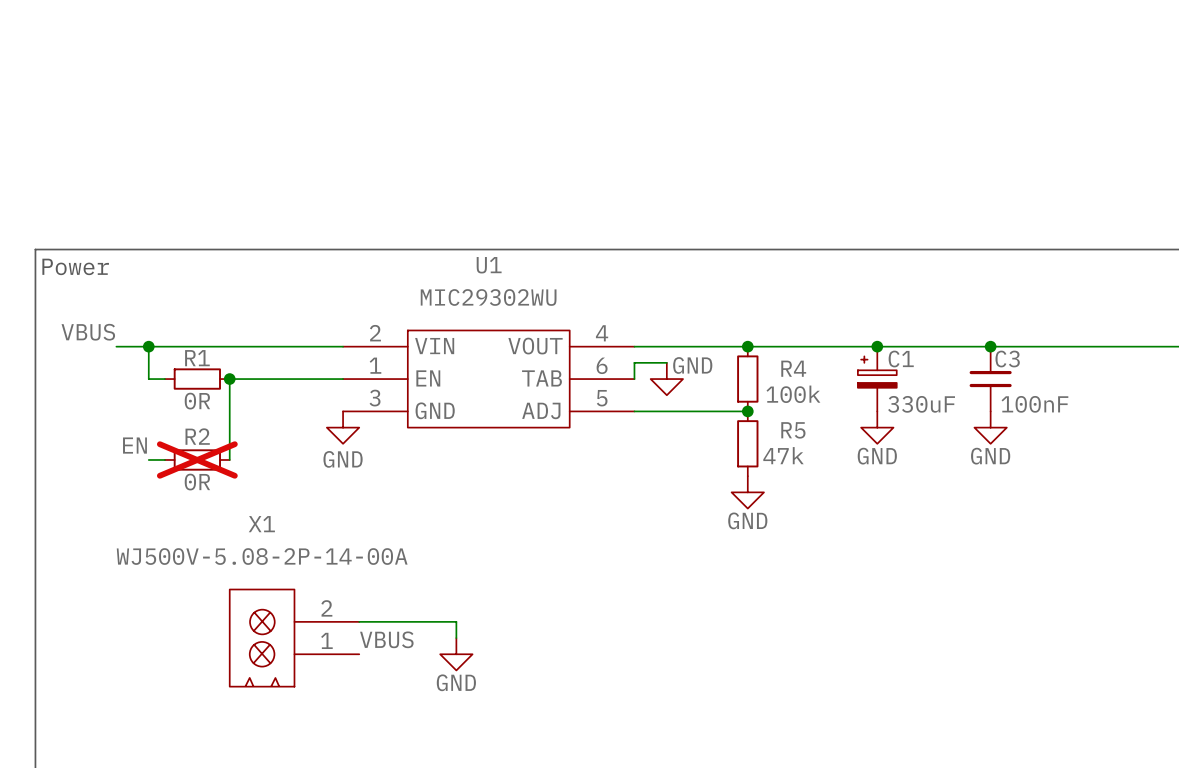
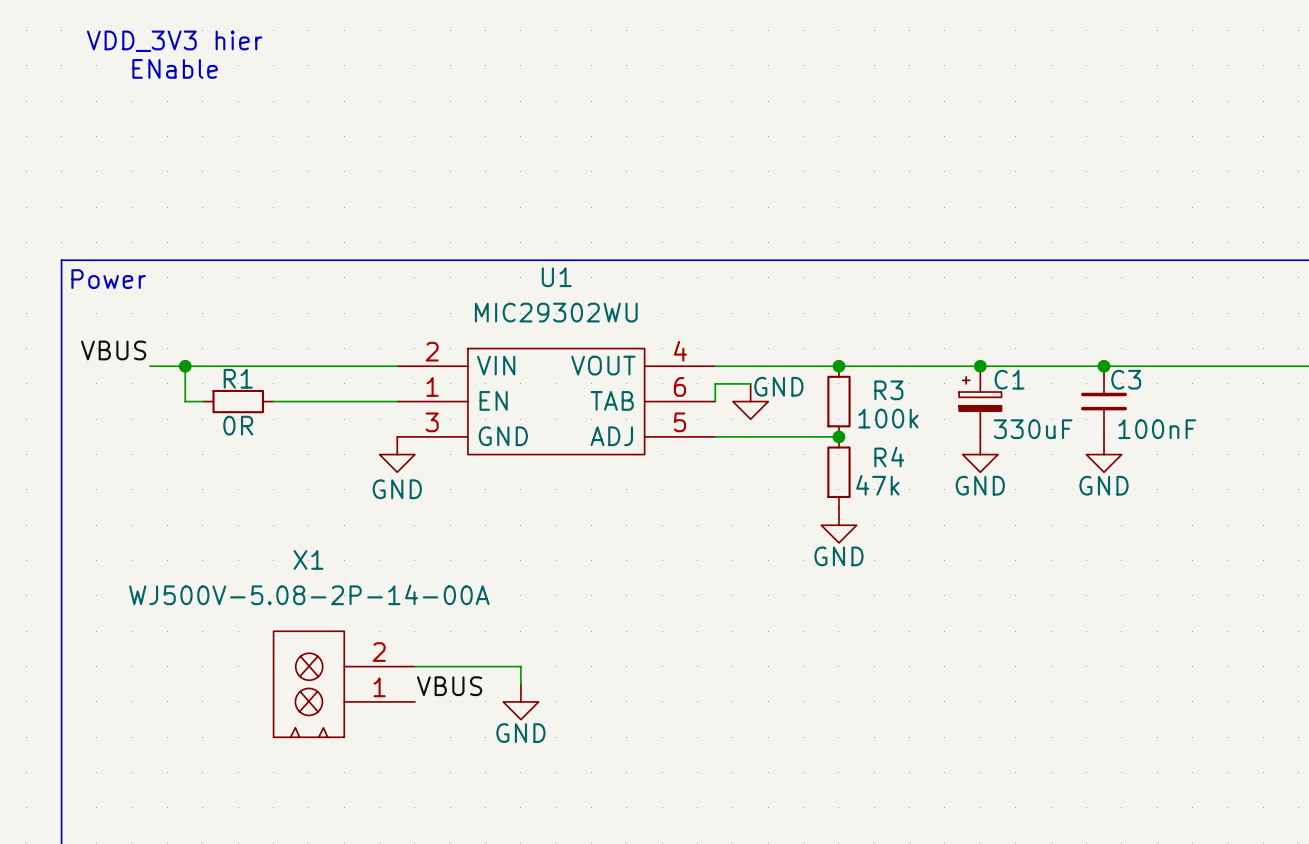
text: none -> VDD_3V3 hier (174, 41)
text: none -> ENable (175, 68)
R4 name: R4 (793, 368) -> R3 (888, 390)
wire: (229, 379) (229, 459) -> none
junction: (229, 379) -> none
R5 name: R5 (793, 430) -> R4 (889, 457)
label: EN (134, 445) -> none
wire: (148, 459) (164, 459) -> none
R2: (197, 459) -> none

